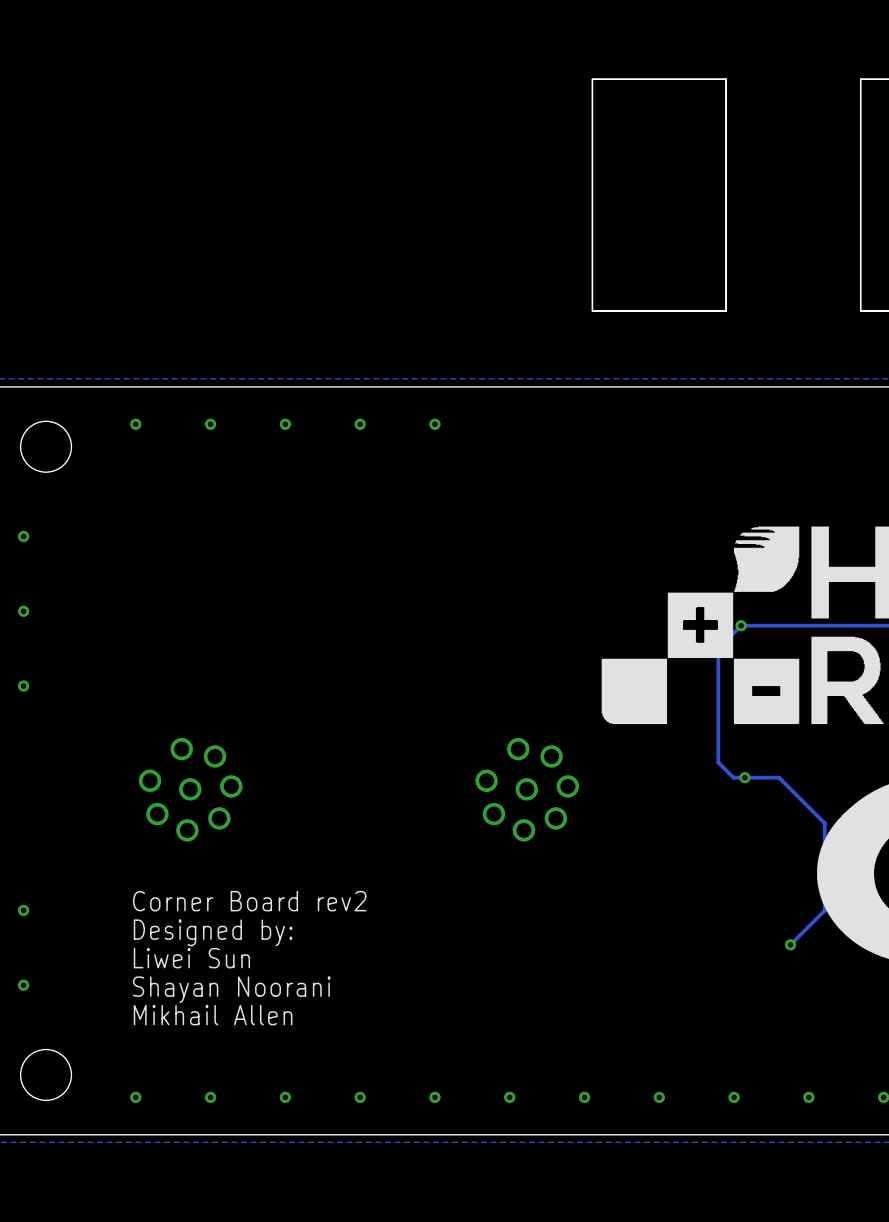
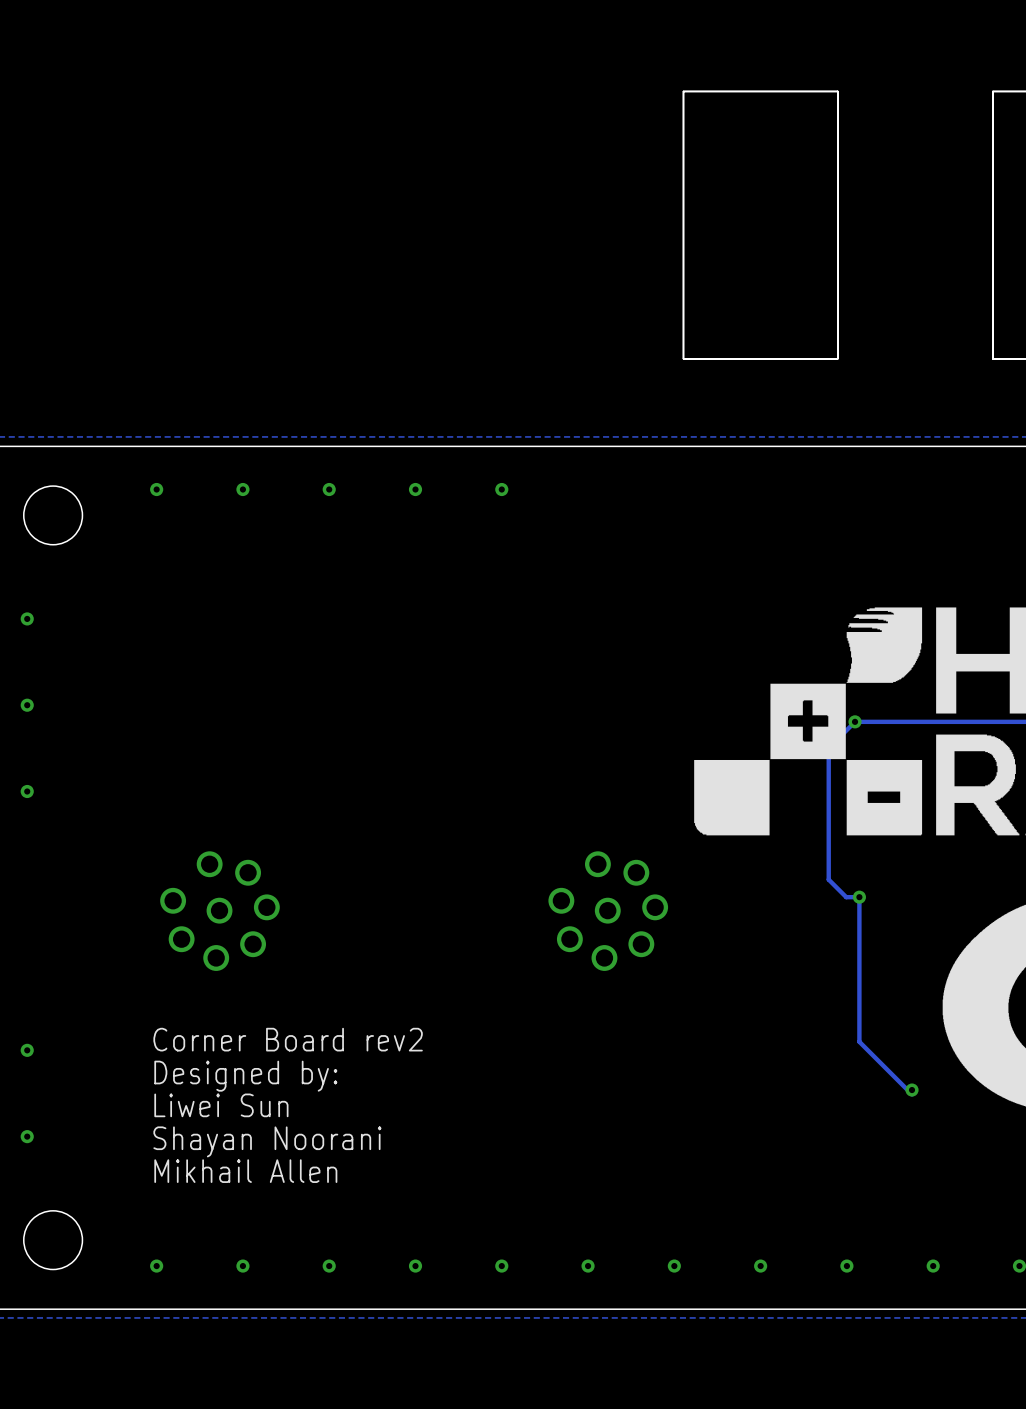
track: (744, 777) (779, 777) (824, 823) (824, 910) (790, 944) -> (859, 897) (859, 1041) (912, 1094)

